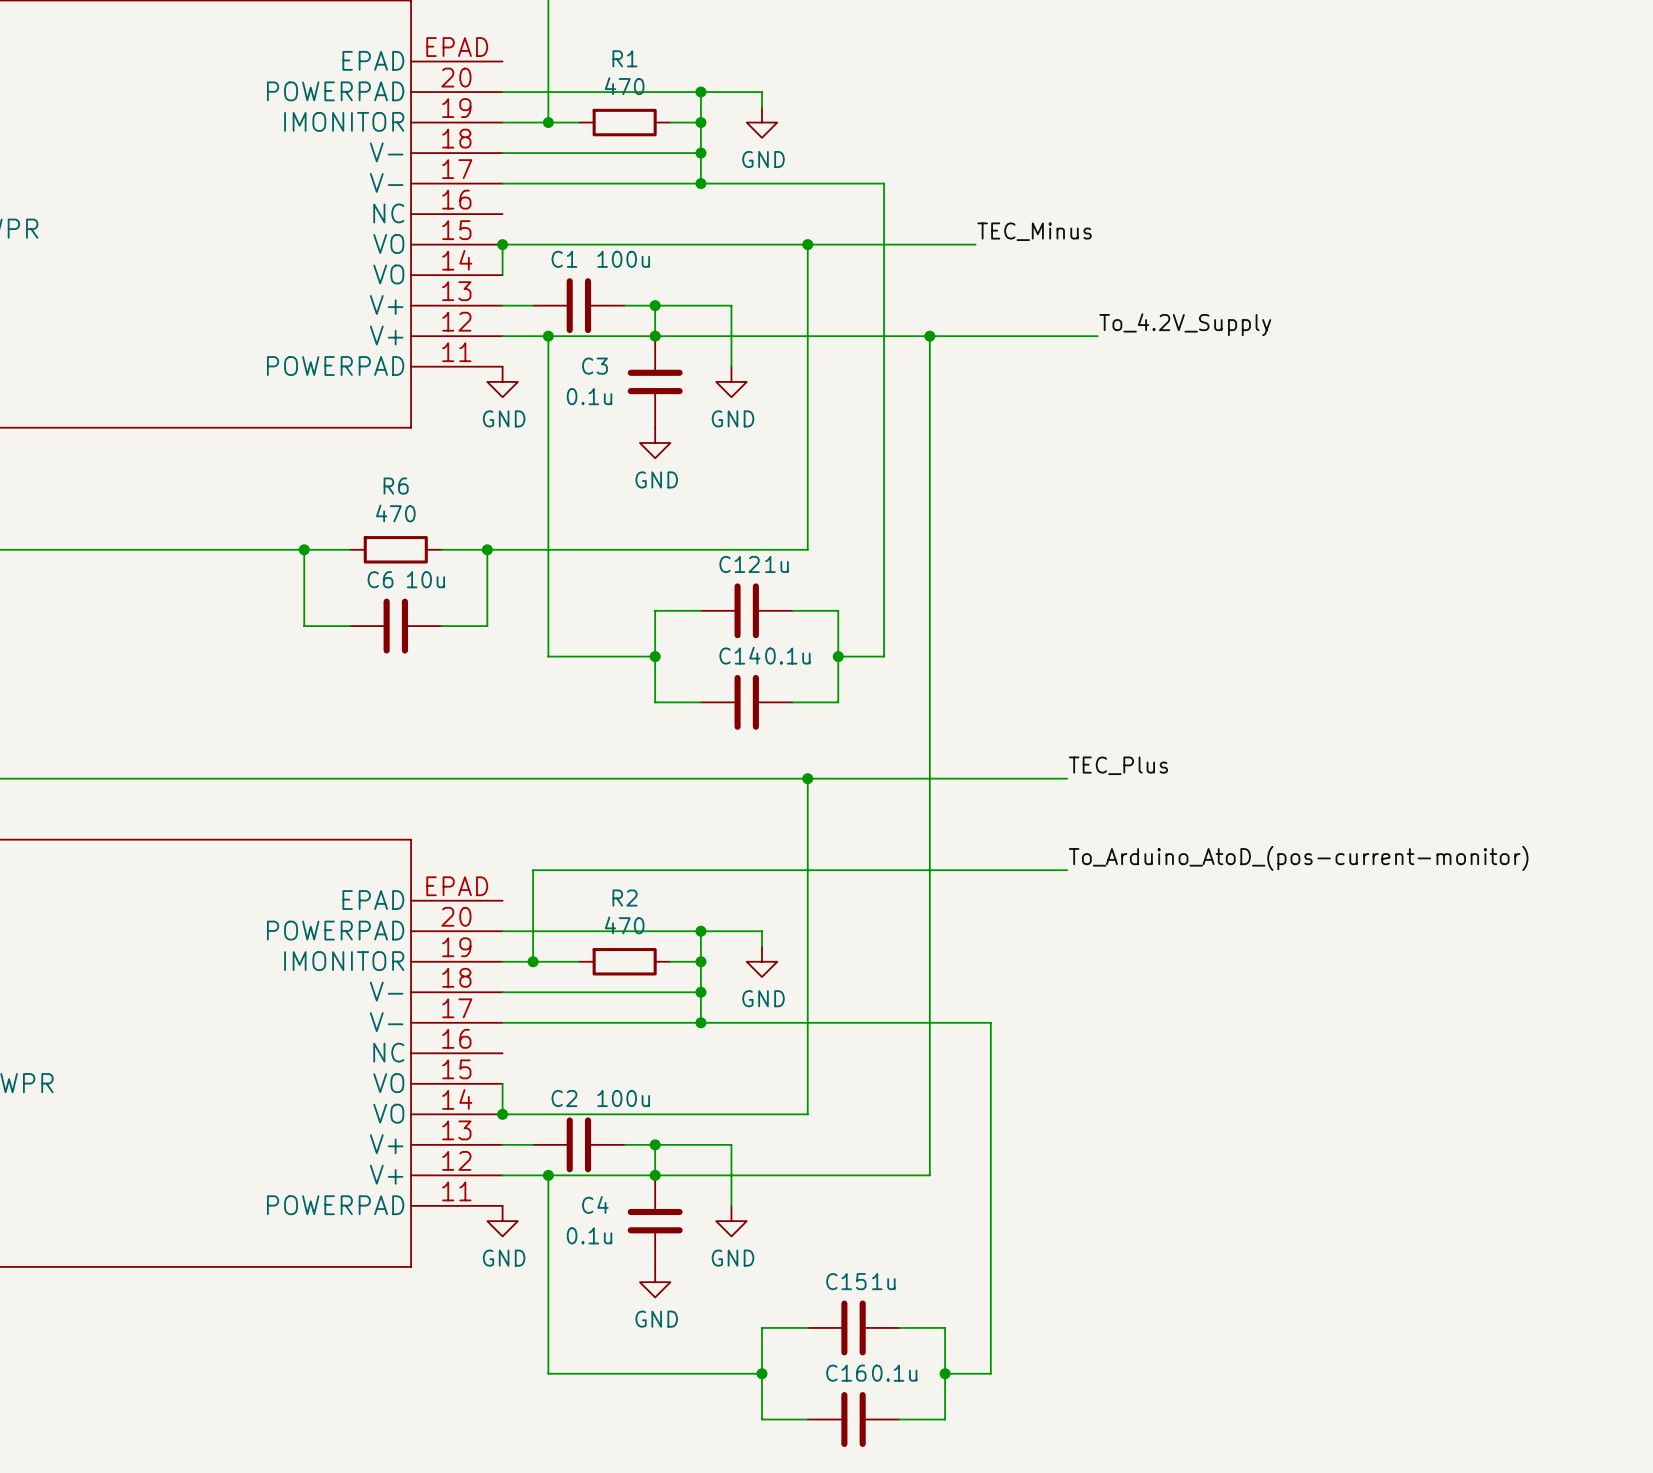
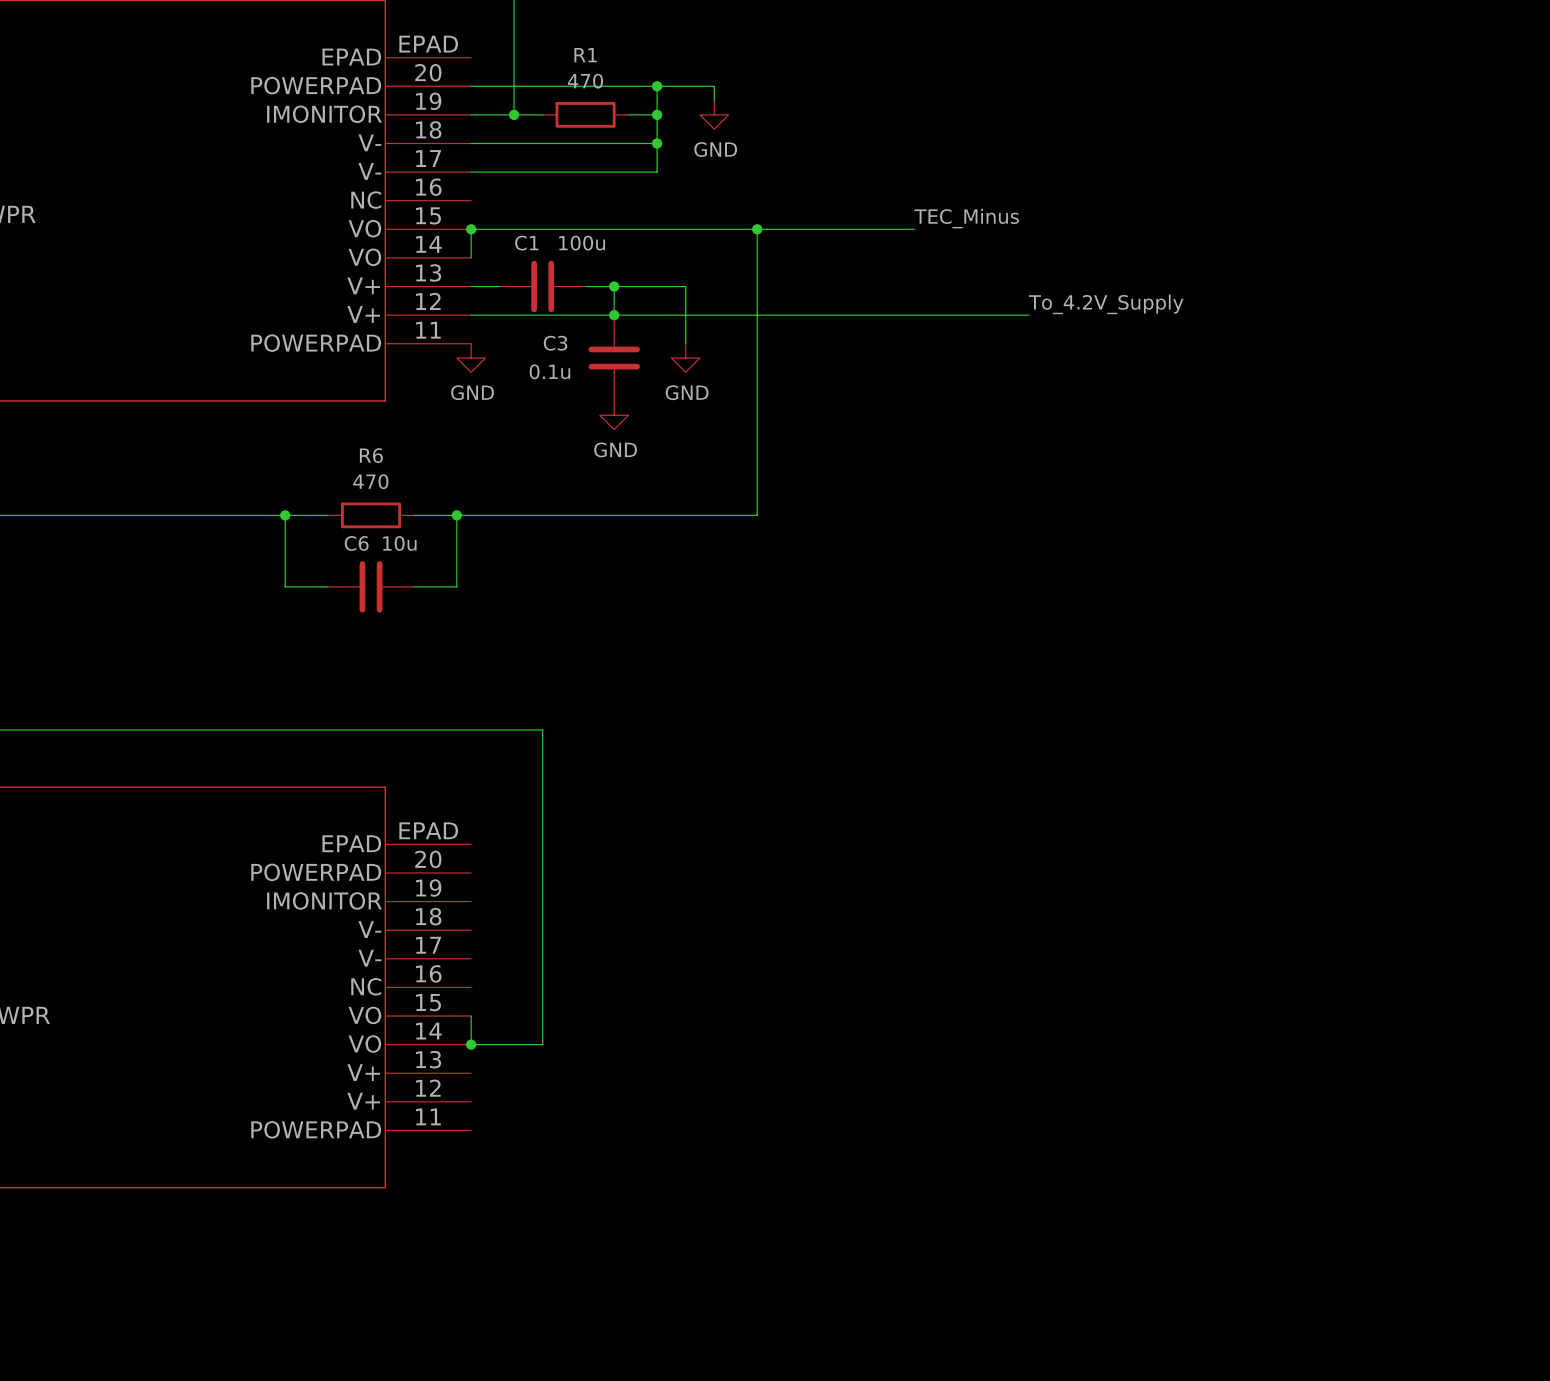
wire: (700, 183) (884, 183) (884, 656) (838, 656) -> none
junction: (700, 183) -> none
wire: (548, 336) (548, 656) (655, 656) -> none
junction: (548, 336) -> none
wire: (929, 336) (929, 1175) (502, 1175) -> none
junction: (929, 336) -> none
wire: (700, 610) (655, 610) (655, 702) (700, 702) -> none
C12: 1u (746, 610) -> none
wire: (792, 610) (838, 610) (838, 702) (792, 702) -> none
junction: (655, 656) -> none
junction: (838, 656) -> none
C14: 0.1u (746, 702) -> none
label: TEC_Plus (1118, 765) -> none
wire: (578, 778) (1067, 778) -> none
wire: (807, 778) (807, 1114) (578, 1114) -> (542, 729) (542, 1044)
junction: (807, 778) -> none
label: To_Arduino_AtoD_(pos-current-monitor) (1298, 858) -> none
wire: (1067, 870) (533, 870) (533, 961) -> none
wire: (502, 931) (761, 931) (761, 946) -> none
wire: (700, 931) (700, 1022) -> none
junction: (700, 931) -> none
wire: (502, 961) (578, 961) -> none
junction: (533, 961) -> none
R2: 470 (624, 961) -> none
wire: (670, 961) (700, 961) -> none
junction: (700, 961) -> none
power symbol: GND (761, 961) -> none
wire: (502, 992) (700, 992) -> none
junction: (700, 992) -> none
wire: (502, 1022) (990, 1022) (990, 1373) (945, 1373) -> none
junction: (700, 1022) -> none
wire: (502, 1144) (533, 1144) -> none
C2: 100u (578, 1144) -> none
wire: (624, 1144) (731, 1144) (731, 1205) -> none
wire: (655, 1144) (655, 1175) -> none
junction: (655, 1144) -> none
wire: (548, 1175) (548, 1373) (761, 1373) -> none
junction: (548, 1175) -> none
junction: (655, 1175) -> none
power symbol: GND (502, 1221) -> none
C4: 0.1u (655, 1221) -> none
power symbol: GND (731, 1221) -> none
power symbol: GND (655, 1282) -> none
wire: (807, 1327) (761, 1327) (761, 1419) (807, 1419) -> none
C15: 1u (853, 1327) -> none
wire: (899, 1327) (945, 1327) (945, 1419) (899, 1419) -> none
junction: (761, 1373) -> none
junction: (945, 1373) -> none
C16: 0.1u (853, 1419) -> none

